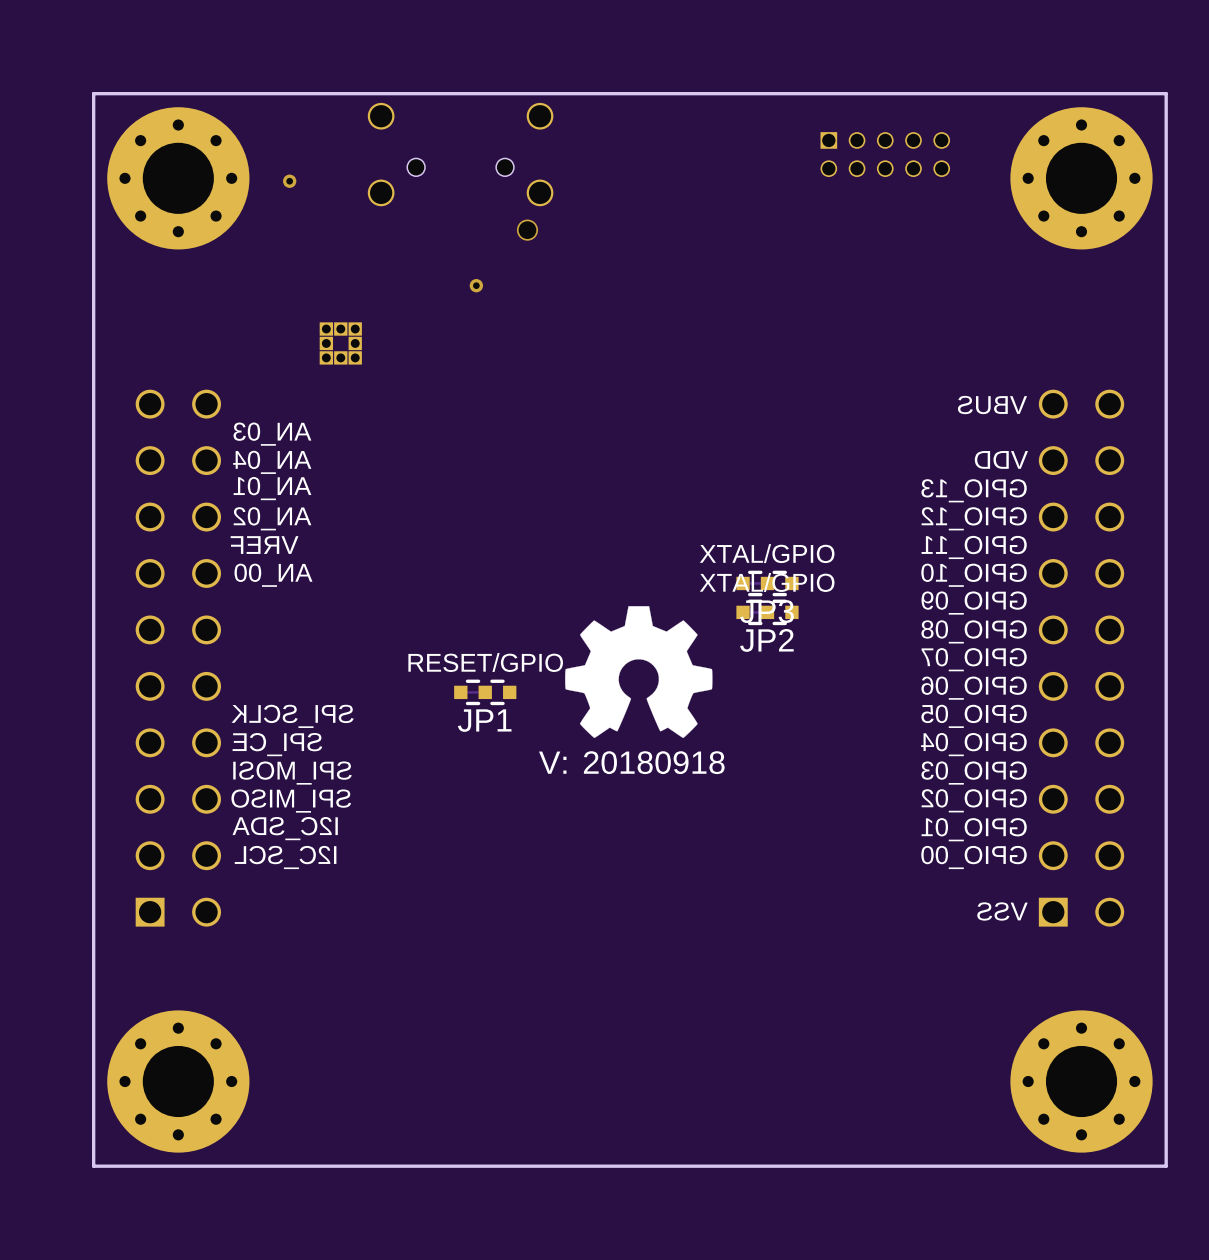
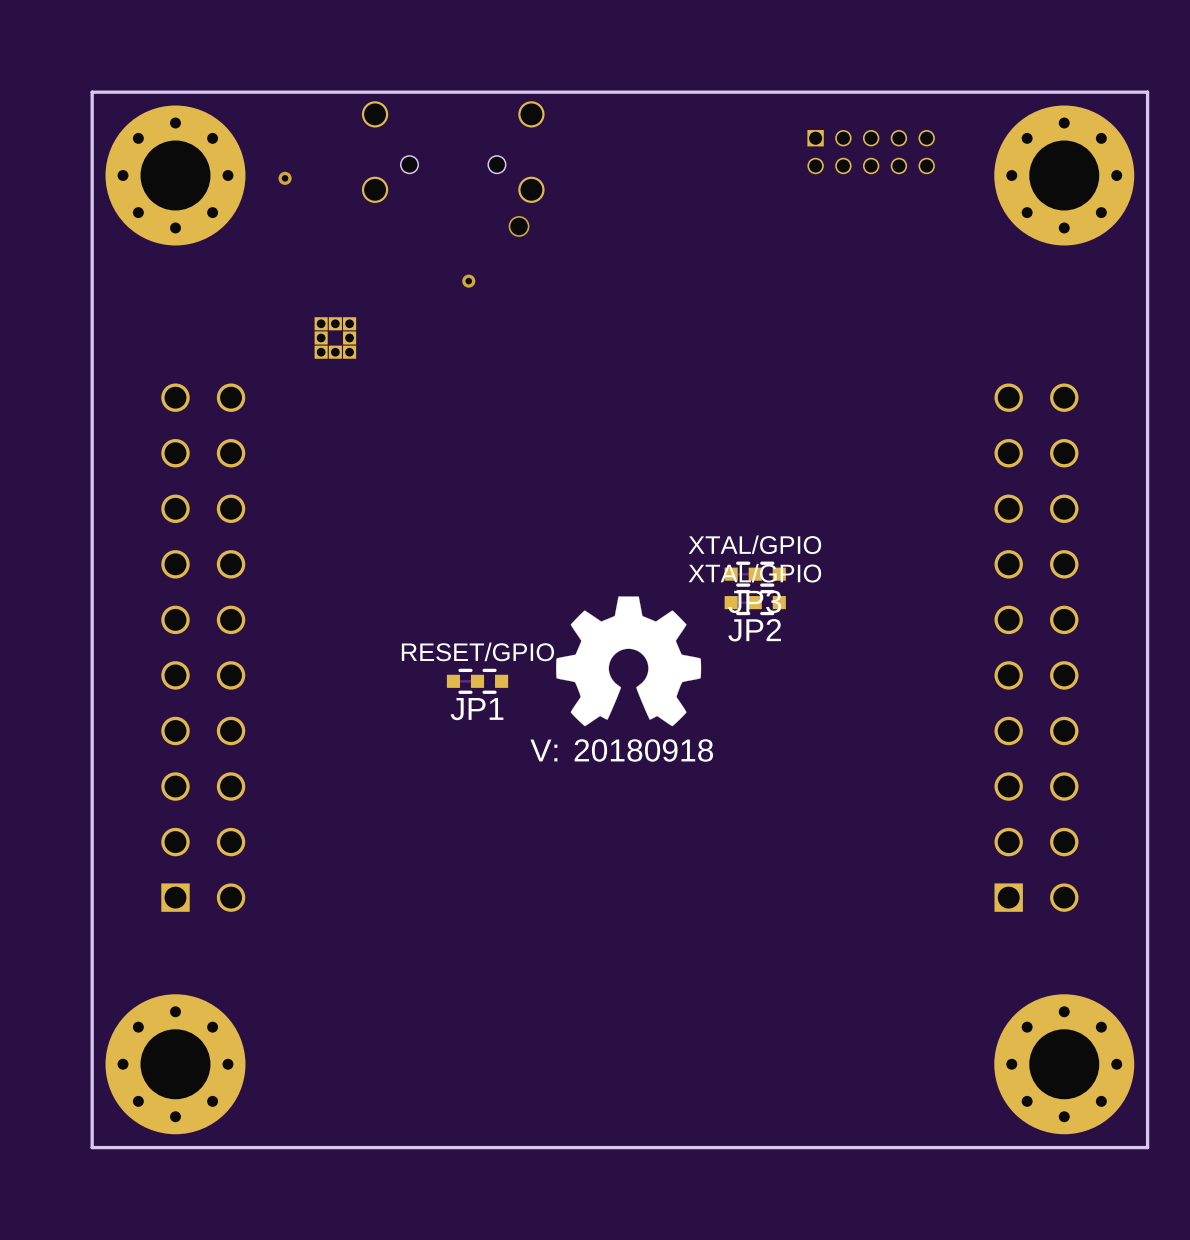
part: (178, 658) -> none
part: none -> (203, 647)
part: none -> (1036, 647)
part: (1081, 658) -> none

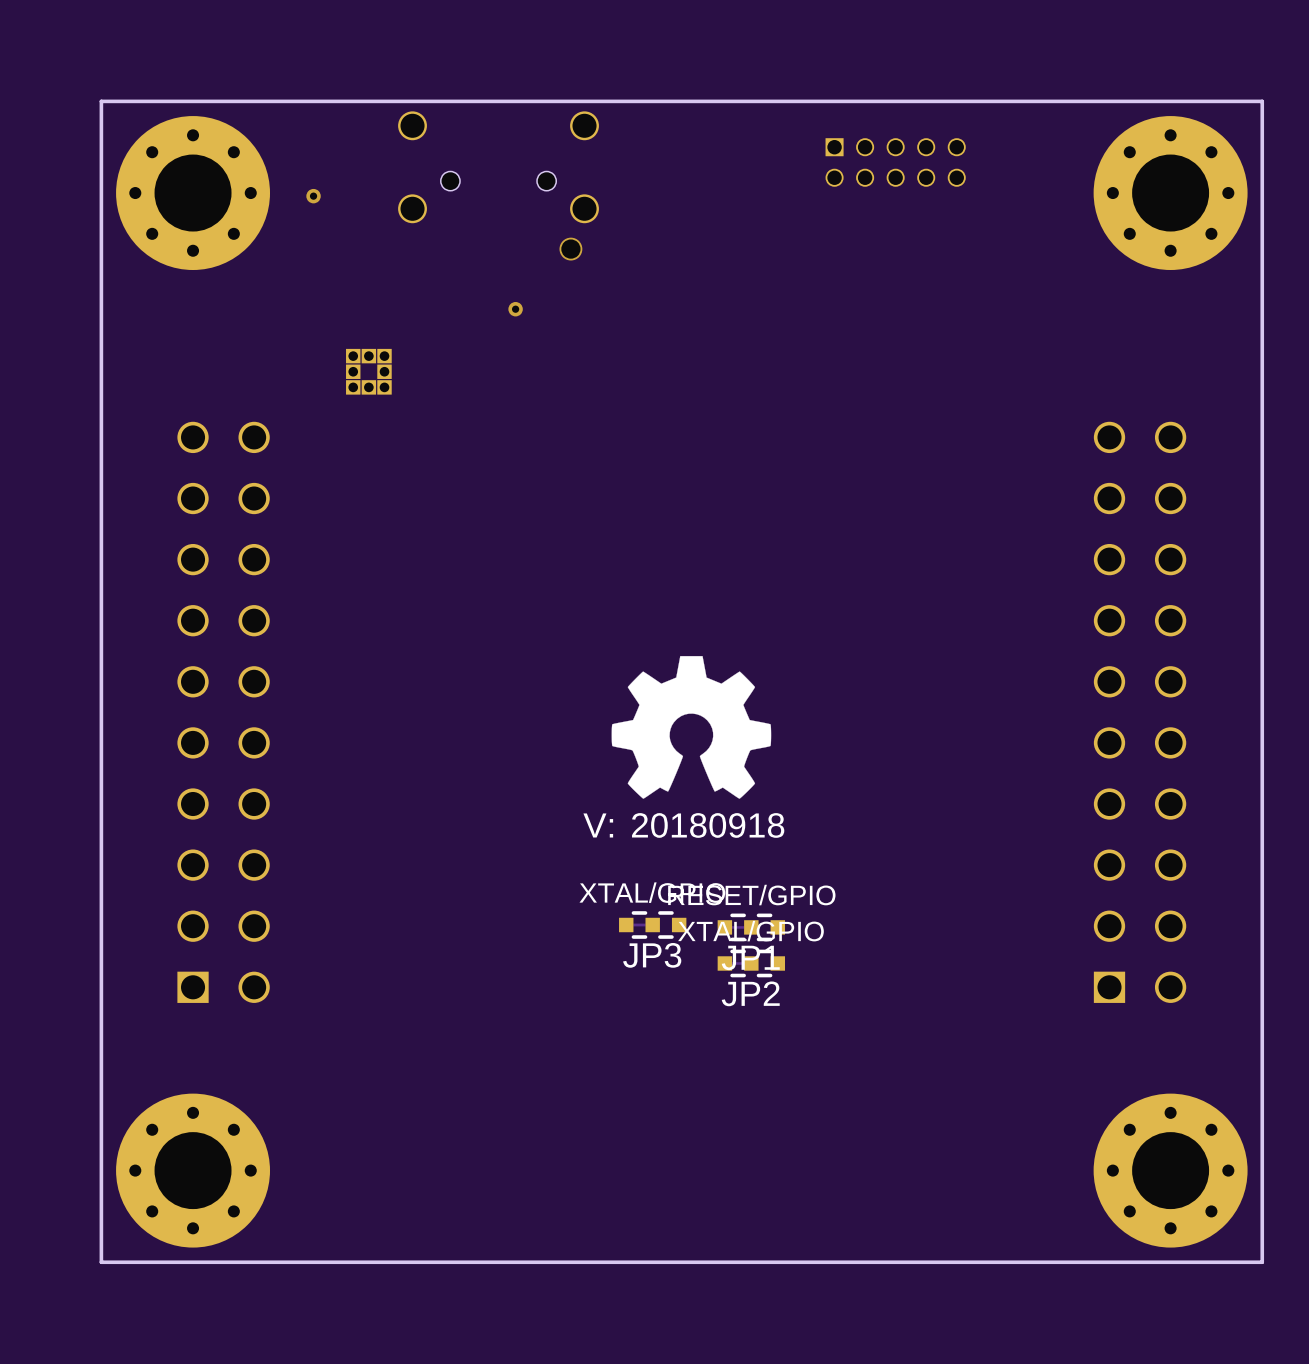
part position: (871, 152) -> (895, 162)
JP3 position: (755, 574) -> (652, 925)
JP2 position: (755, 602) -> (751, 963)
JP1 position: (477, 681) -> (751, 927)

